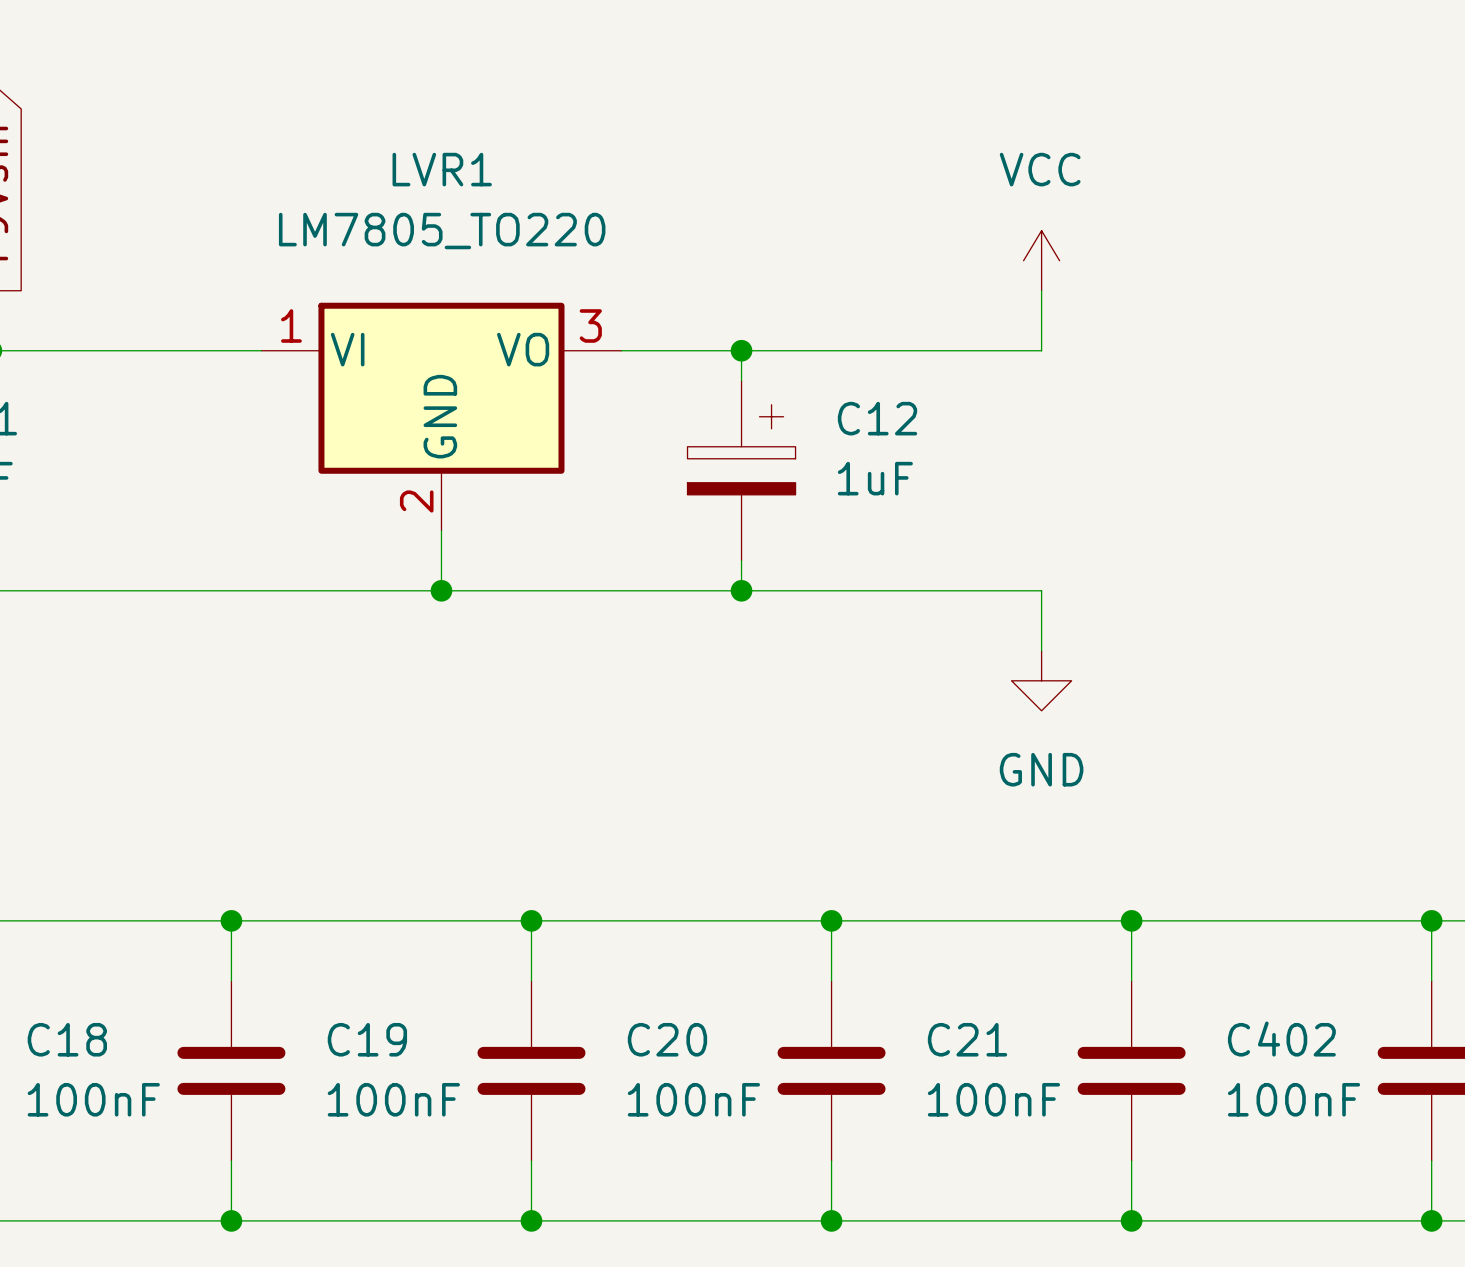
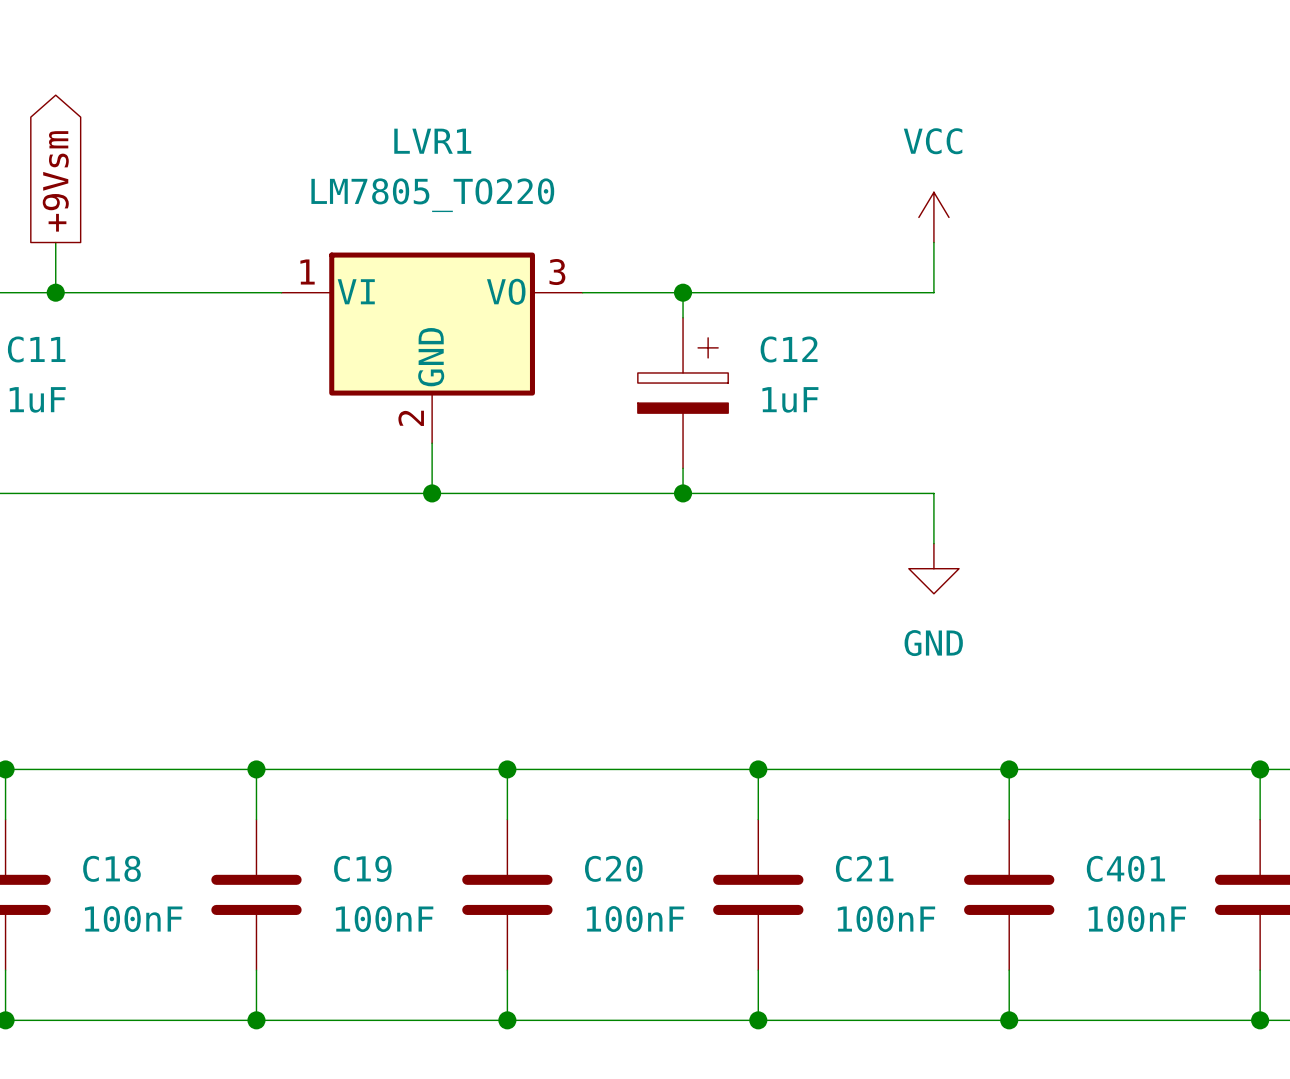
C402 name: C402 (1281, 1039) -> C401 (1125, 868)

